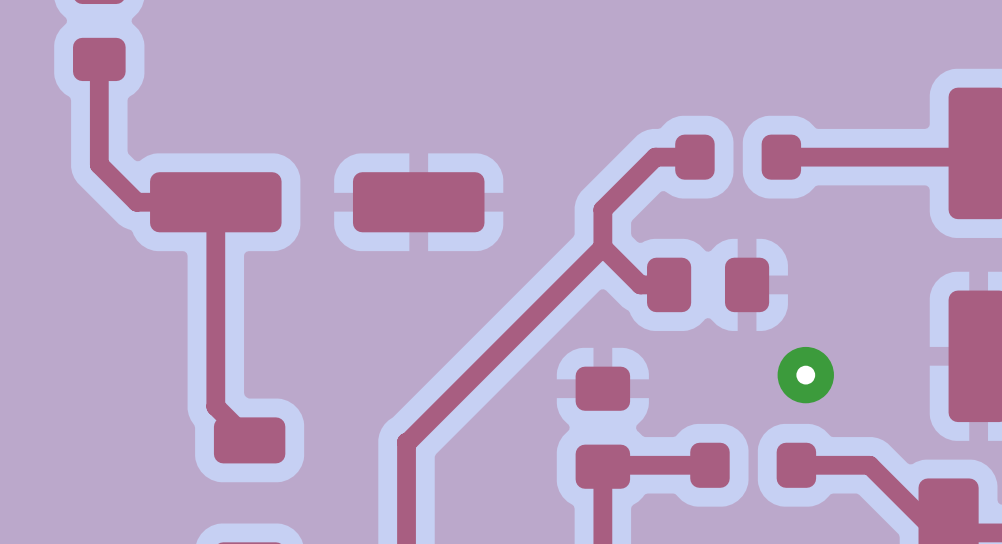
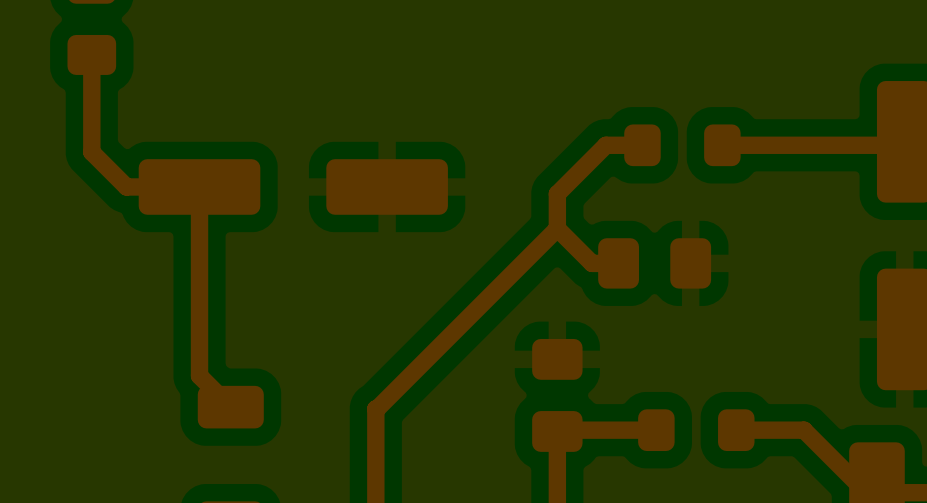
via: (805, 375) -> none

